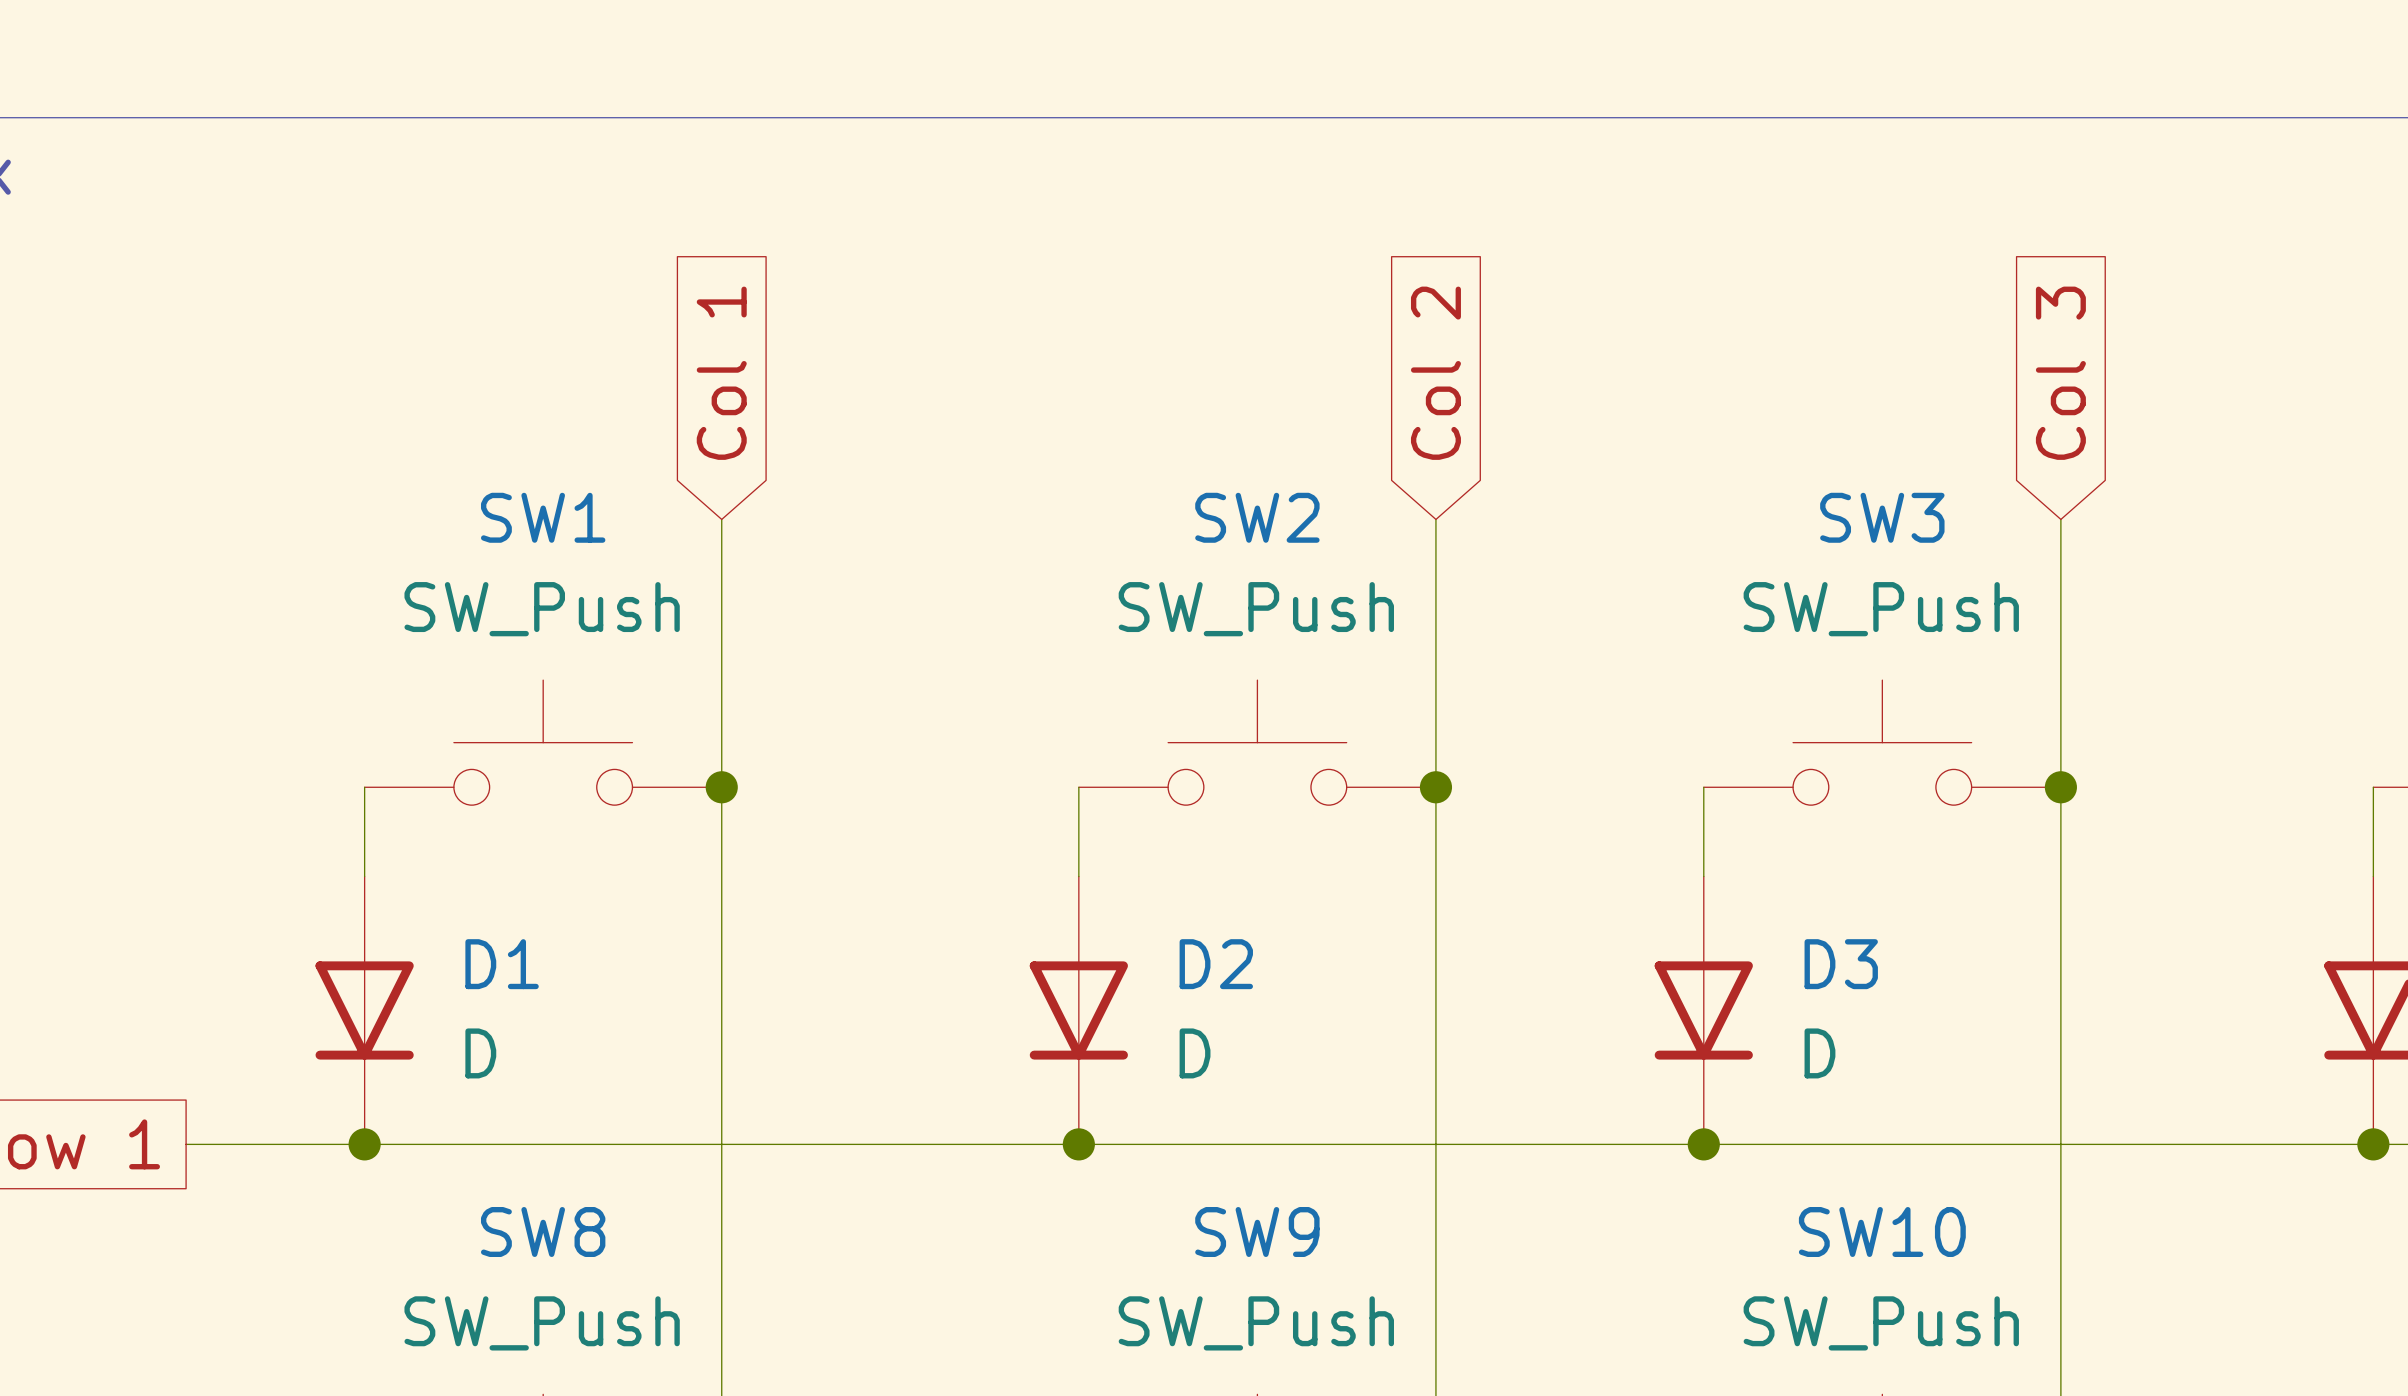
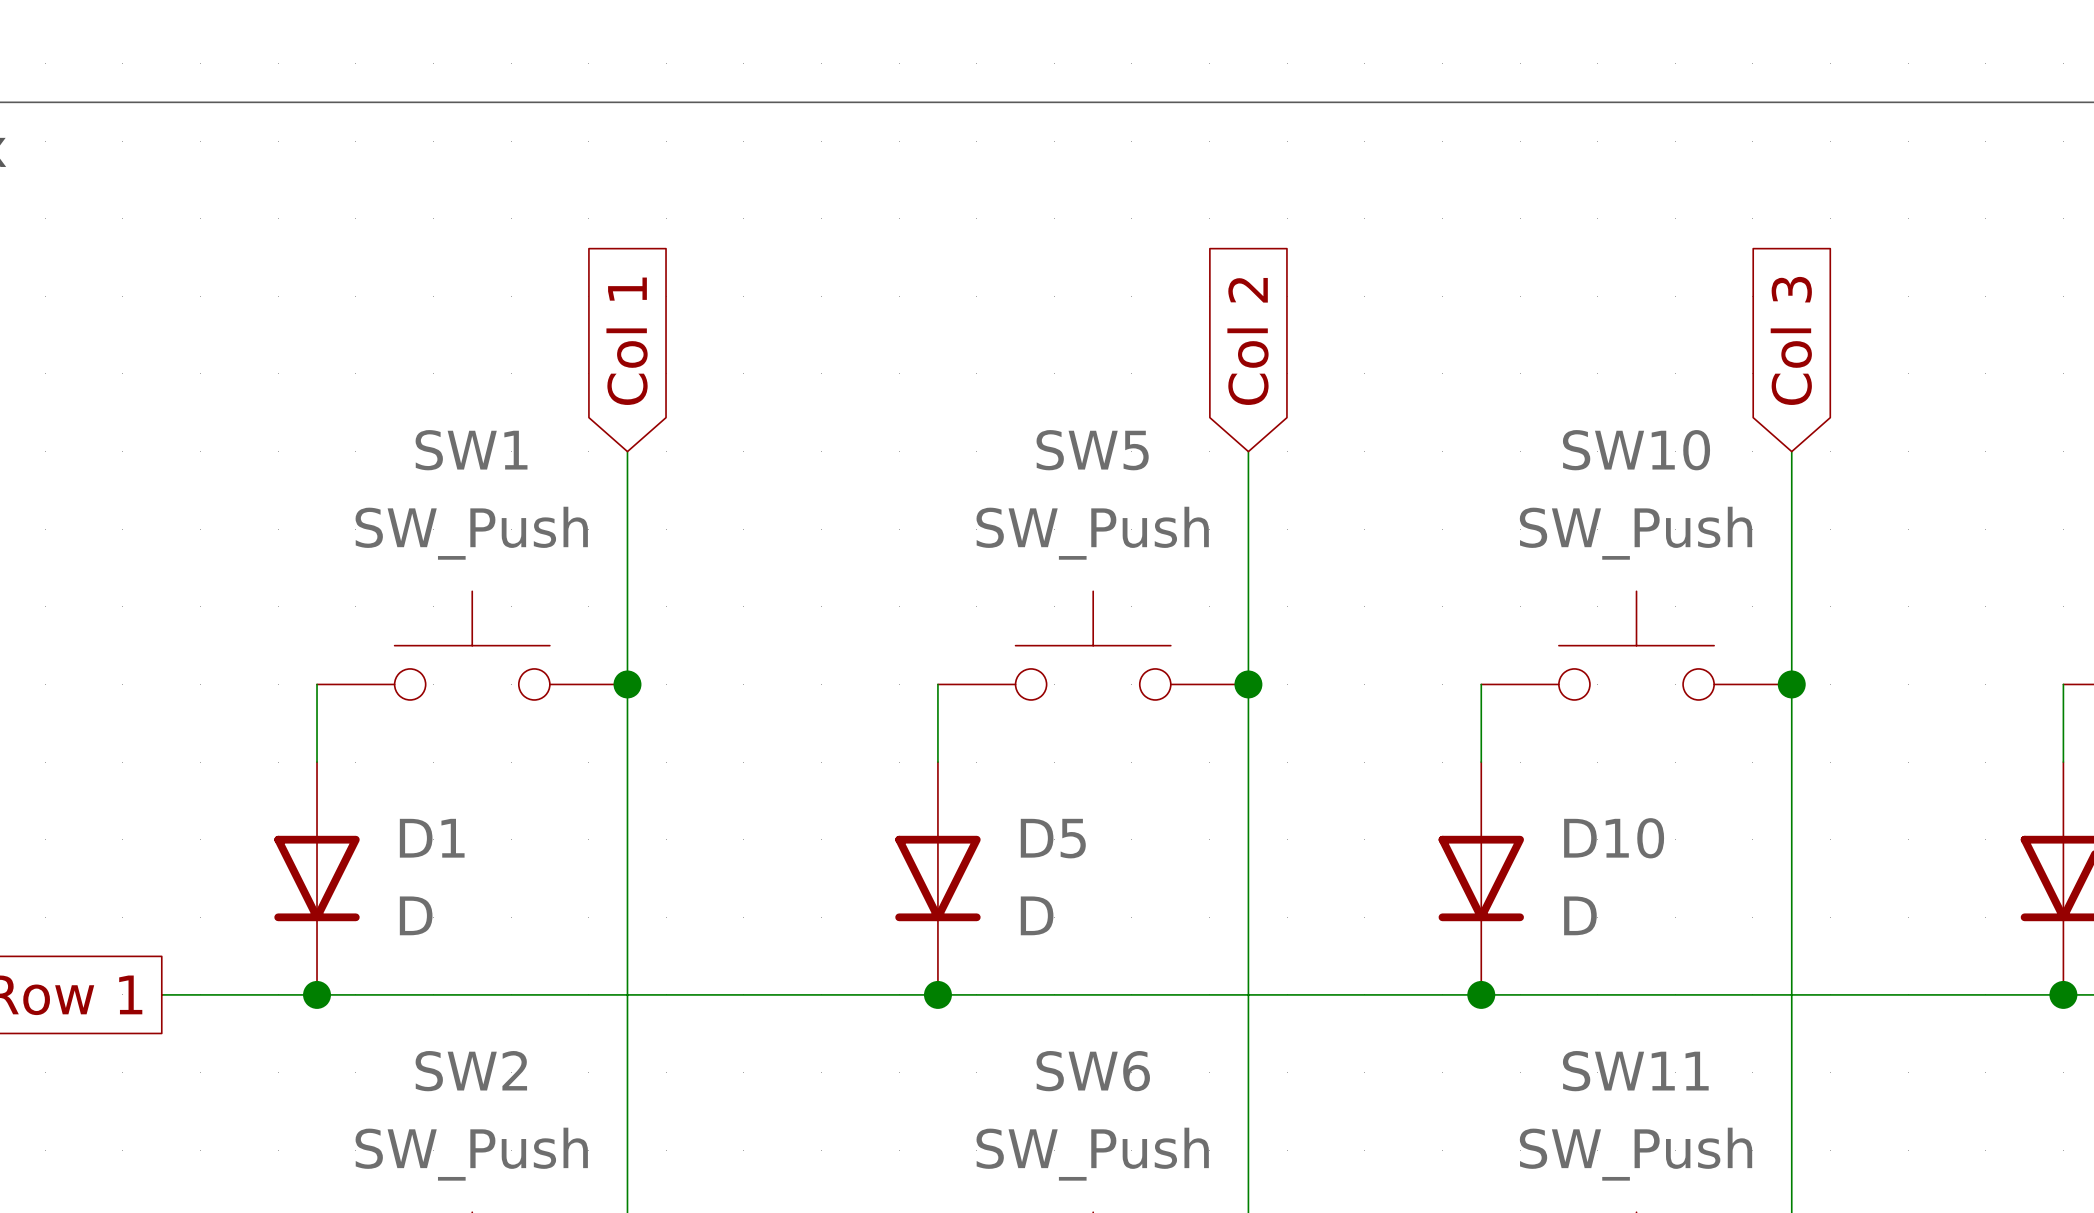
SW2 name: SW2 (1257, 517) -> SW5 (1092, 450)
SW3 name: SW3 (1882, 517) -> SW10 (1636, 450)
D2 name: D2 (1216, 964) -> D5 (1053, 838)
D3 name: D3 (1841, 964) -> D10 (1614, 838)
SW8 name: SW8 (543, 1231) -> SW2 (471, 1071)
SW9 name: SW9 (1257, 1231) -> SW6 (1093, 1071)
SW10 name: SW10 (1882, 1231) -> SW11 (1635, 1071)

